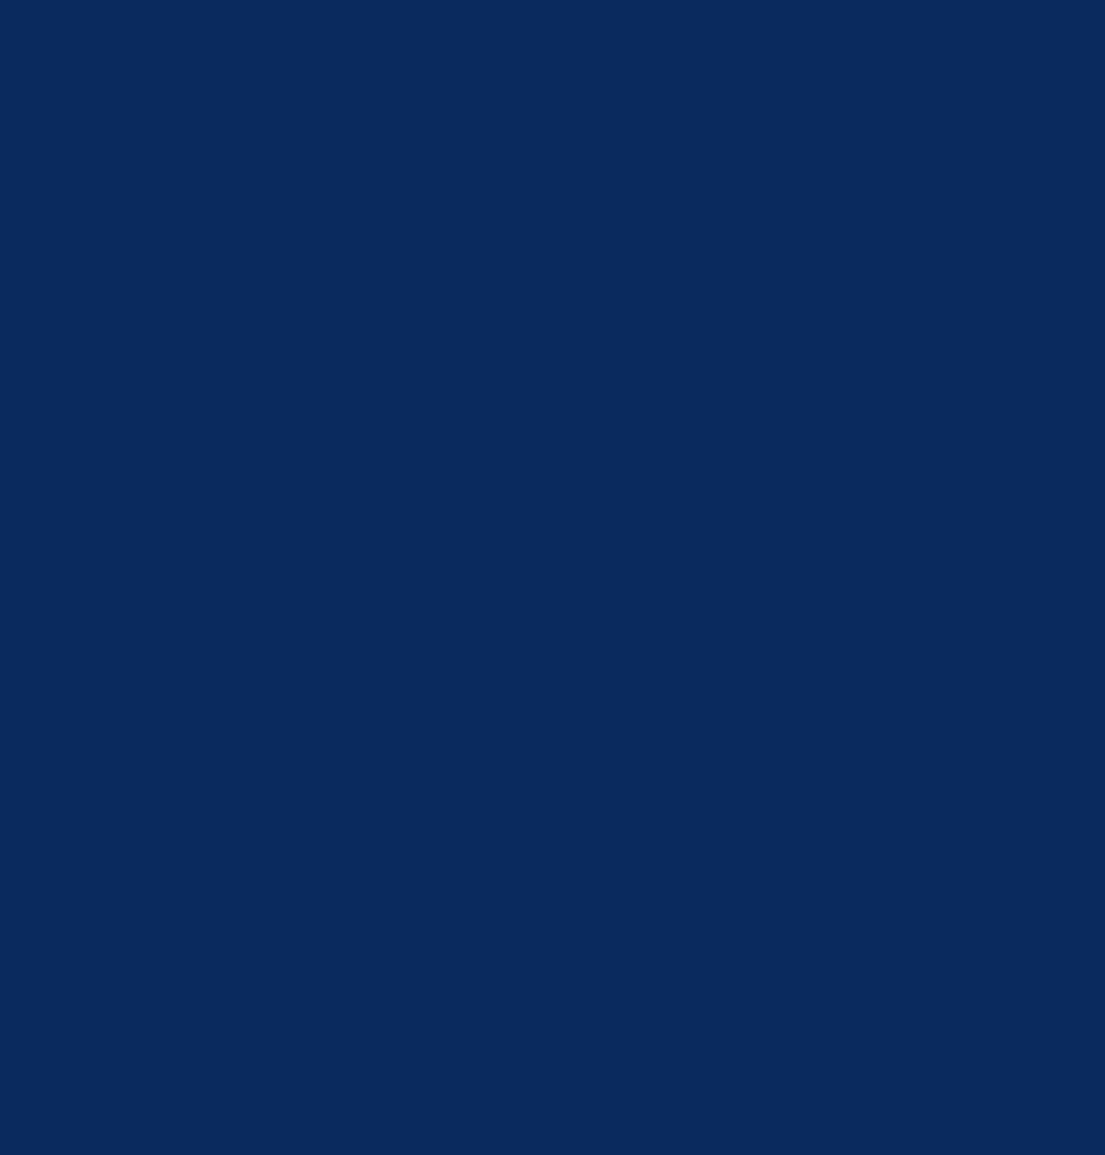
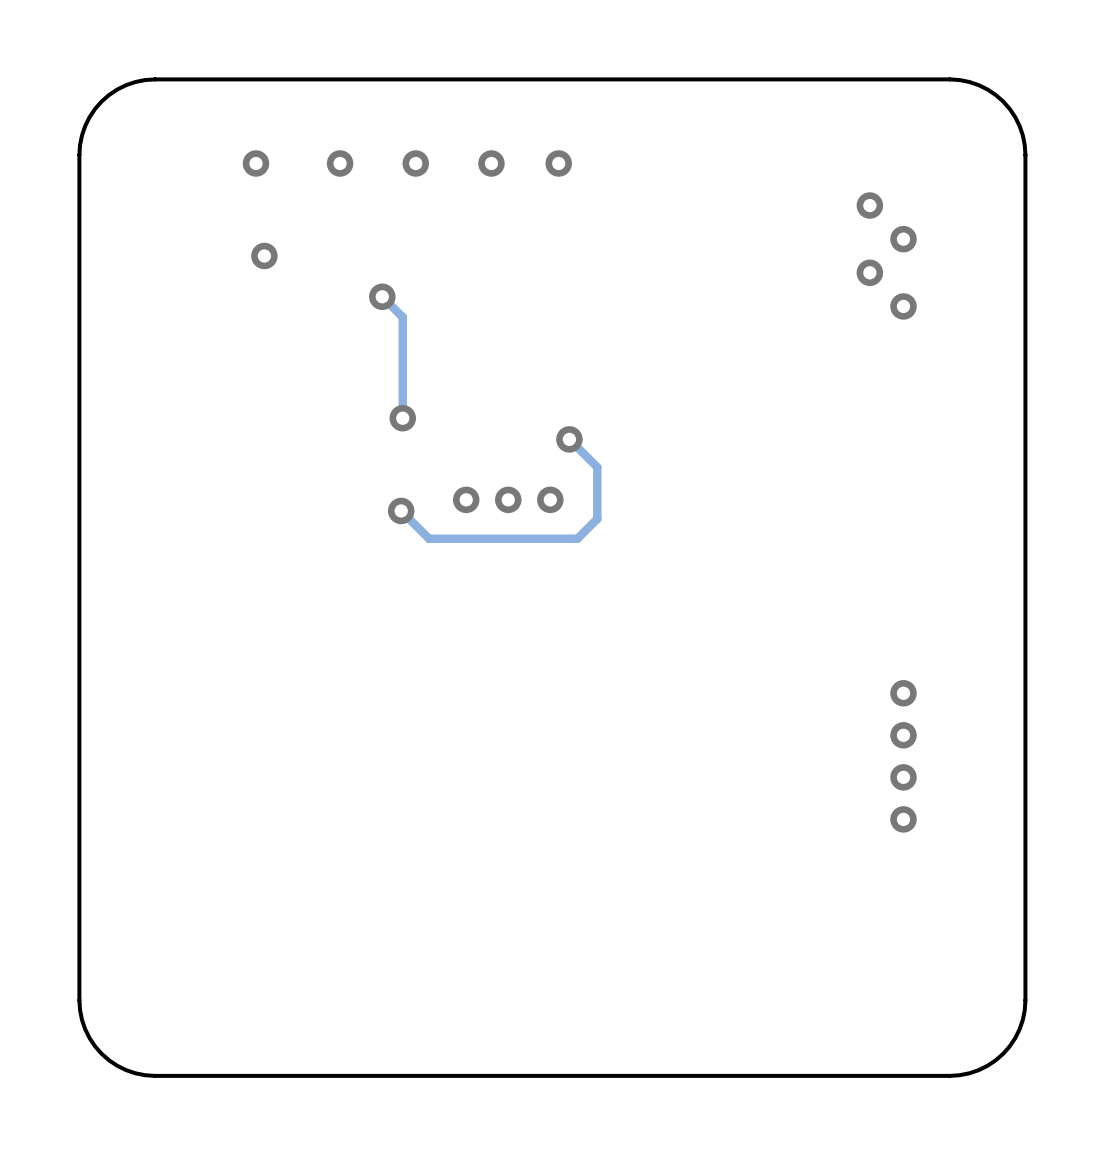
board edge: none -> (949, 79) (155, 79) (135, 81) (117, 89) (95, 109) (85, 126) (79, 155) (79, 1000) (81, 1019) (89, 1038) (109, 1060) (126, 1070) (155, 1075) (949, 1075) (978, 1070) (995, 1060) (1009, 1046) (1022, 1019) (1025, 1000) (1025, 155) (1019, 126) (1003, 101) (978, 85) (949, 79)
via: none -> (255, 163)
via: none -> (340, 163)
via: none -> (415, 163)
via: none -> (491, 163)
via: none -> (558, 163)
via: none -> (869, 205)
via: none -> (903, 239)
via: none -> (264, 255)
via: none -> (869, 272)
track: none -> (382, 296) (402, 317) (402, 418)
via: none -> (382, 296)
via: none -> (903, 306)
via: none -> (402, 418)
track: none -> (569, 439) (597, 467) (597, 518) (577, 538) (428, 538) (401, 510)
via: none -> (569, 439)
via: none -> (466, 499)
via: none -> (508, 499)
via: none -> (550, 499)
via: none -> (401, 510)
via: none -> (903, 693)
via: none -> (903, 735)
via: none -> (903, 777)
via: none -> (903, 819)

